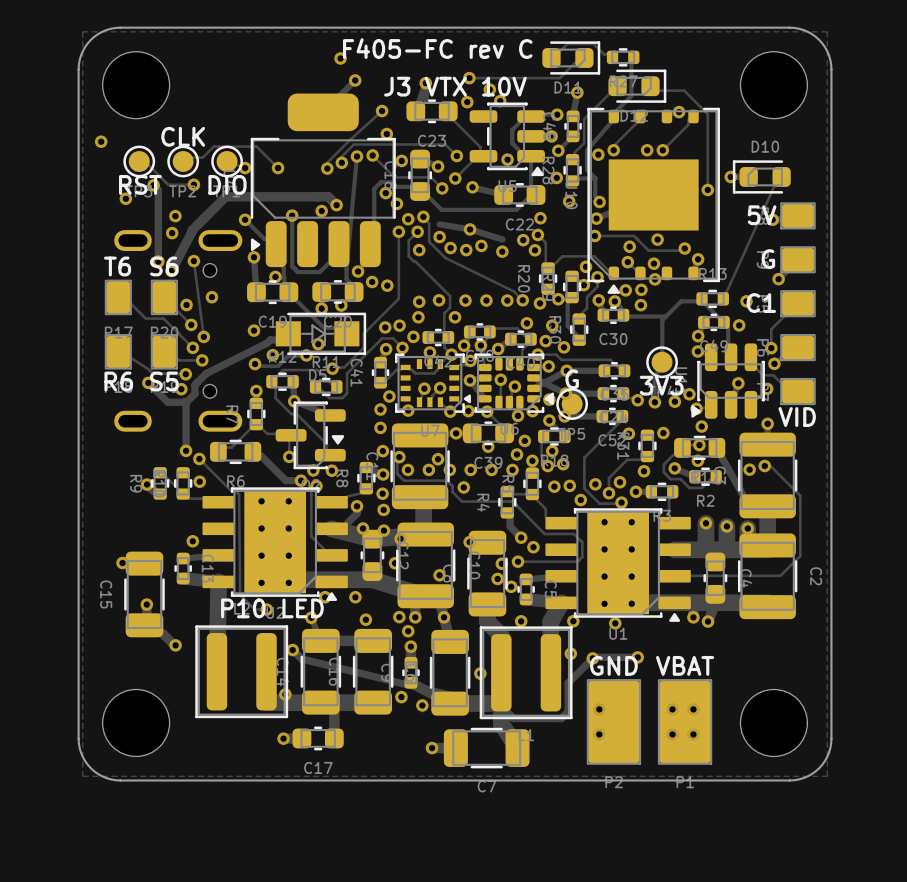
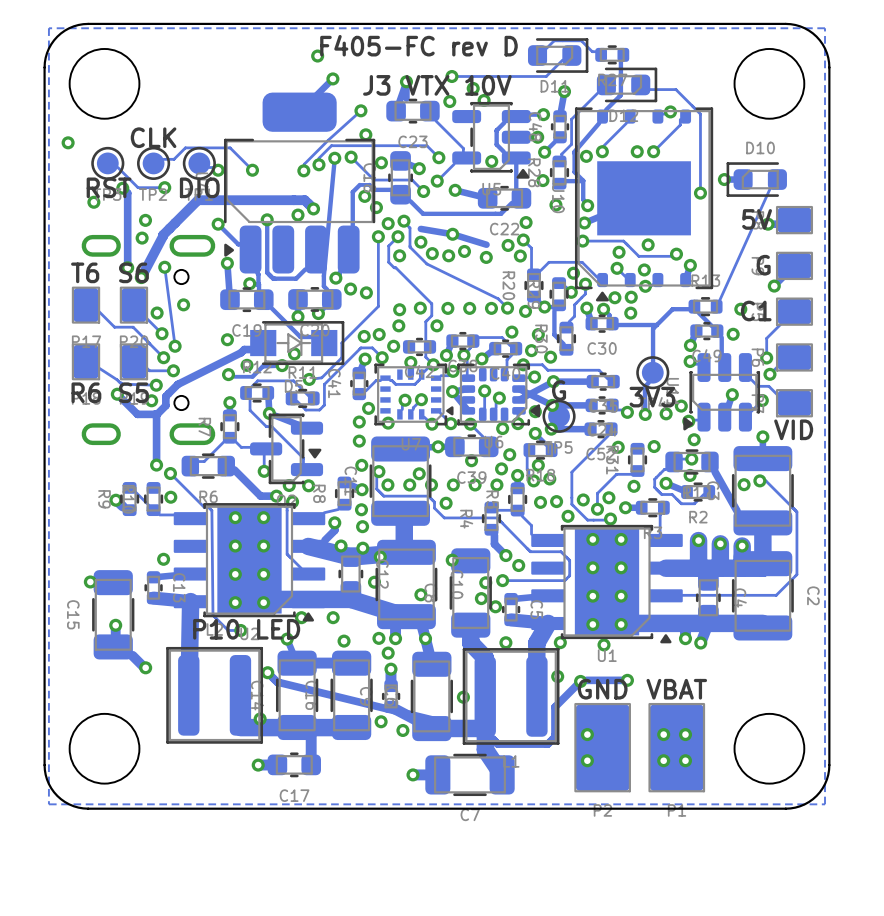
text: F405-FC rev C (437, 48) -> F405-FC rev D (418, 45)

